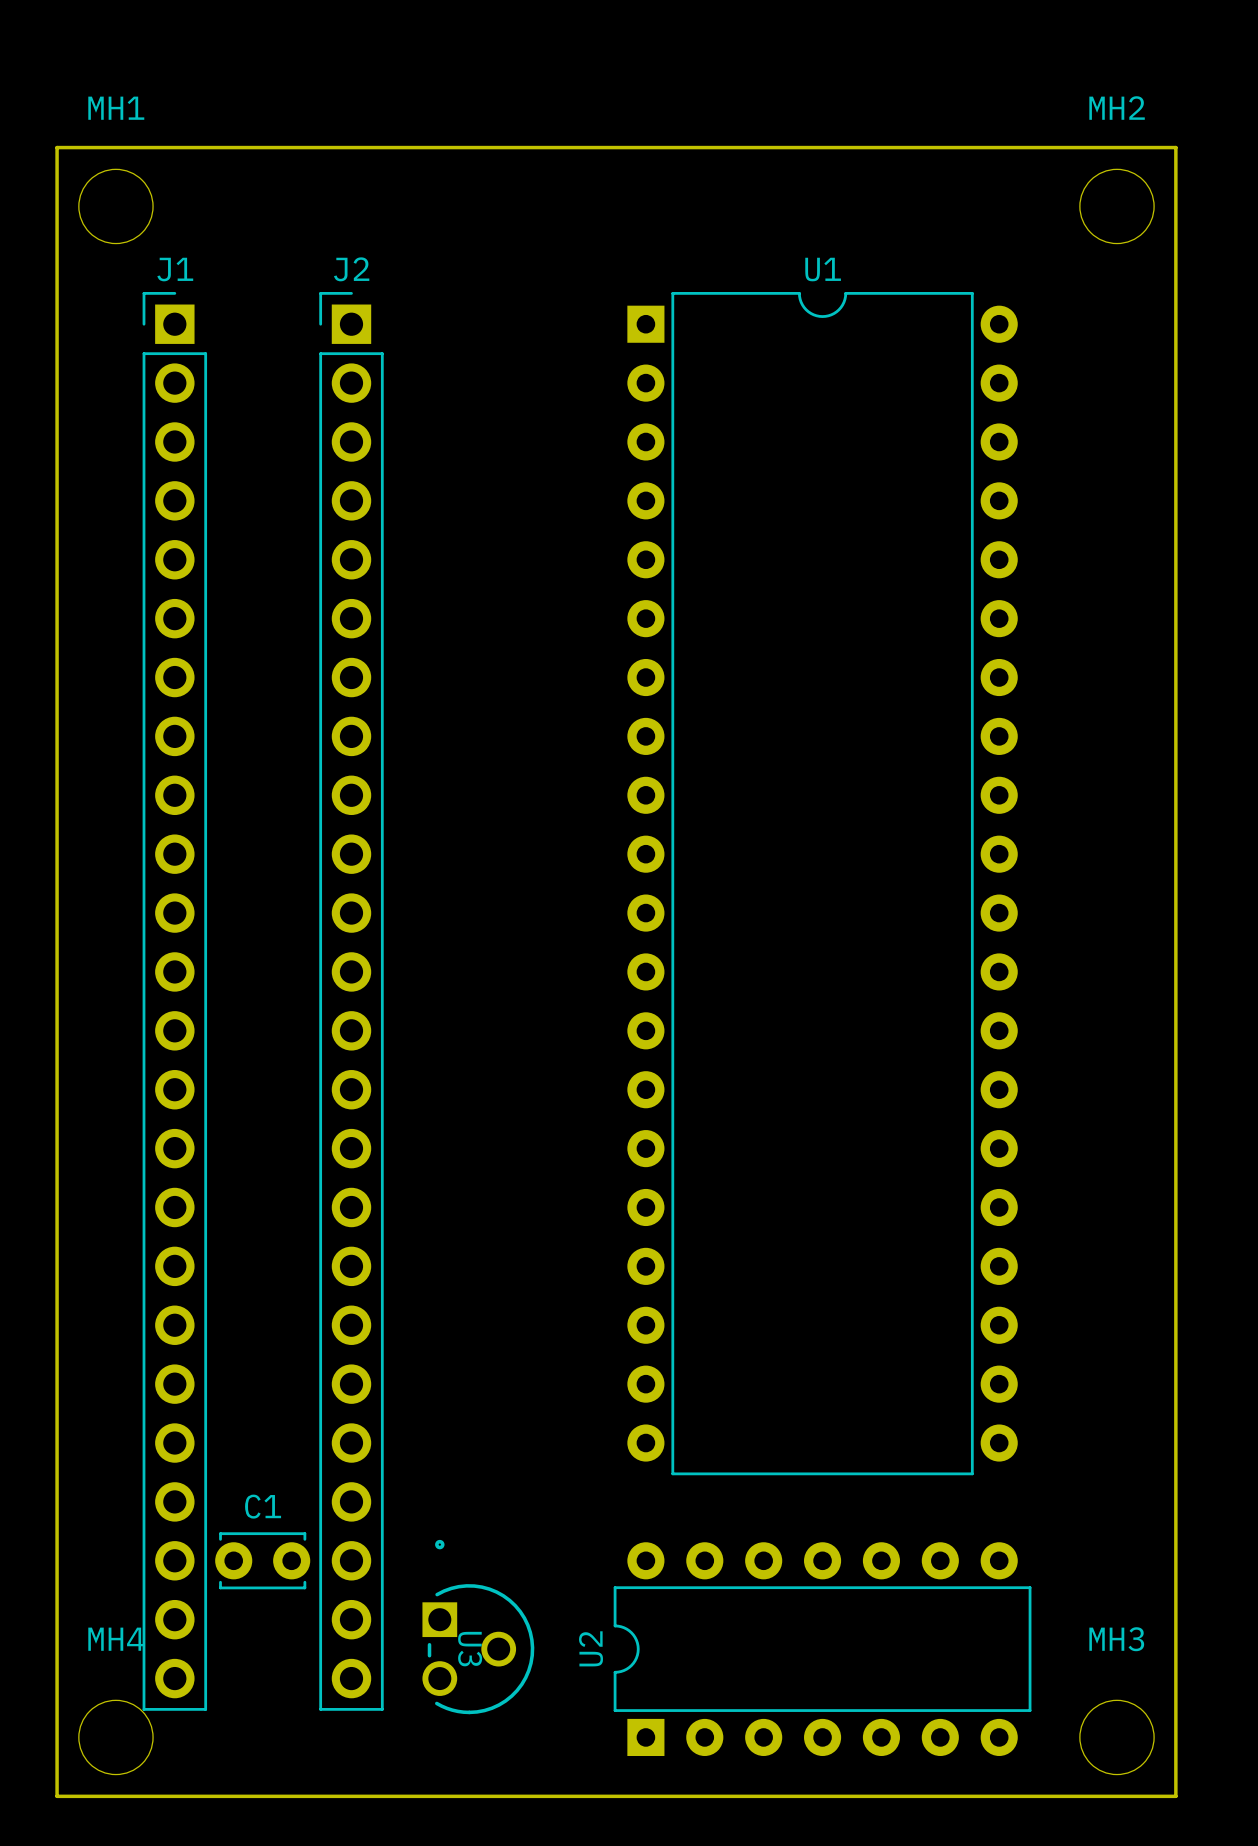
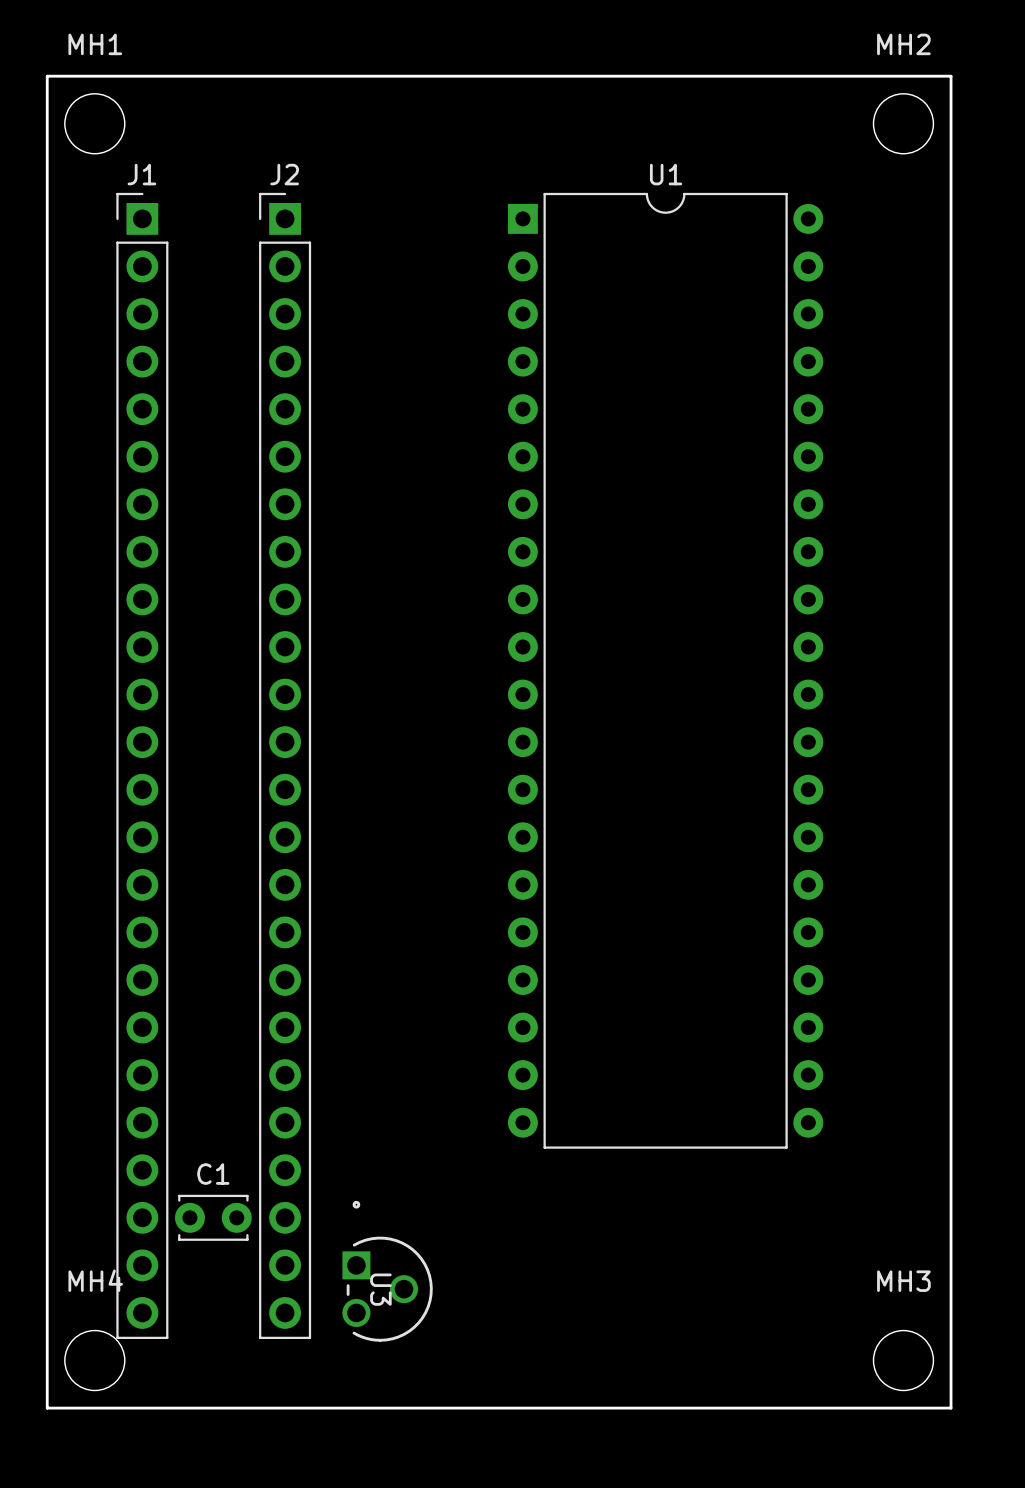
U2: (822, 1649) -> none

